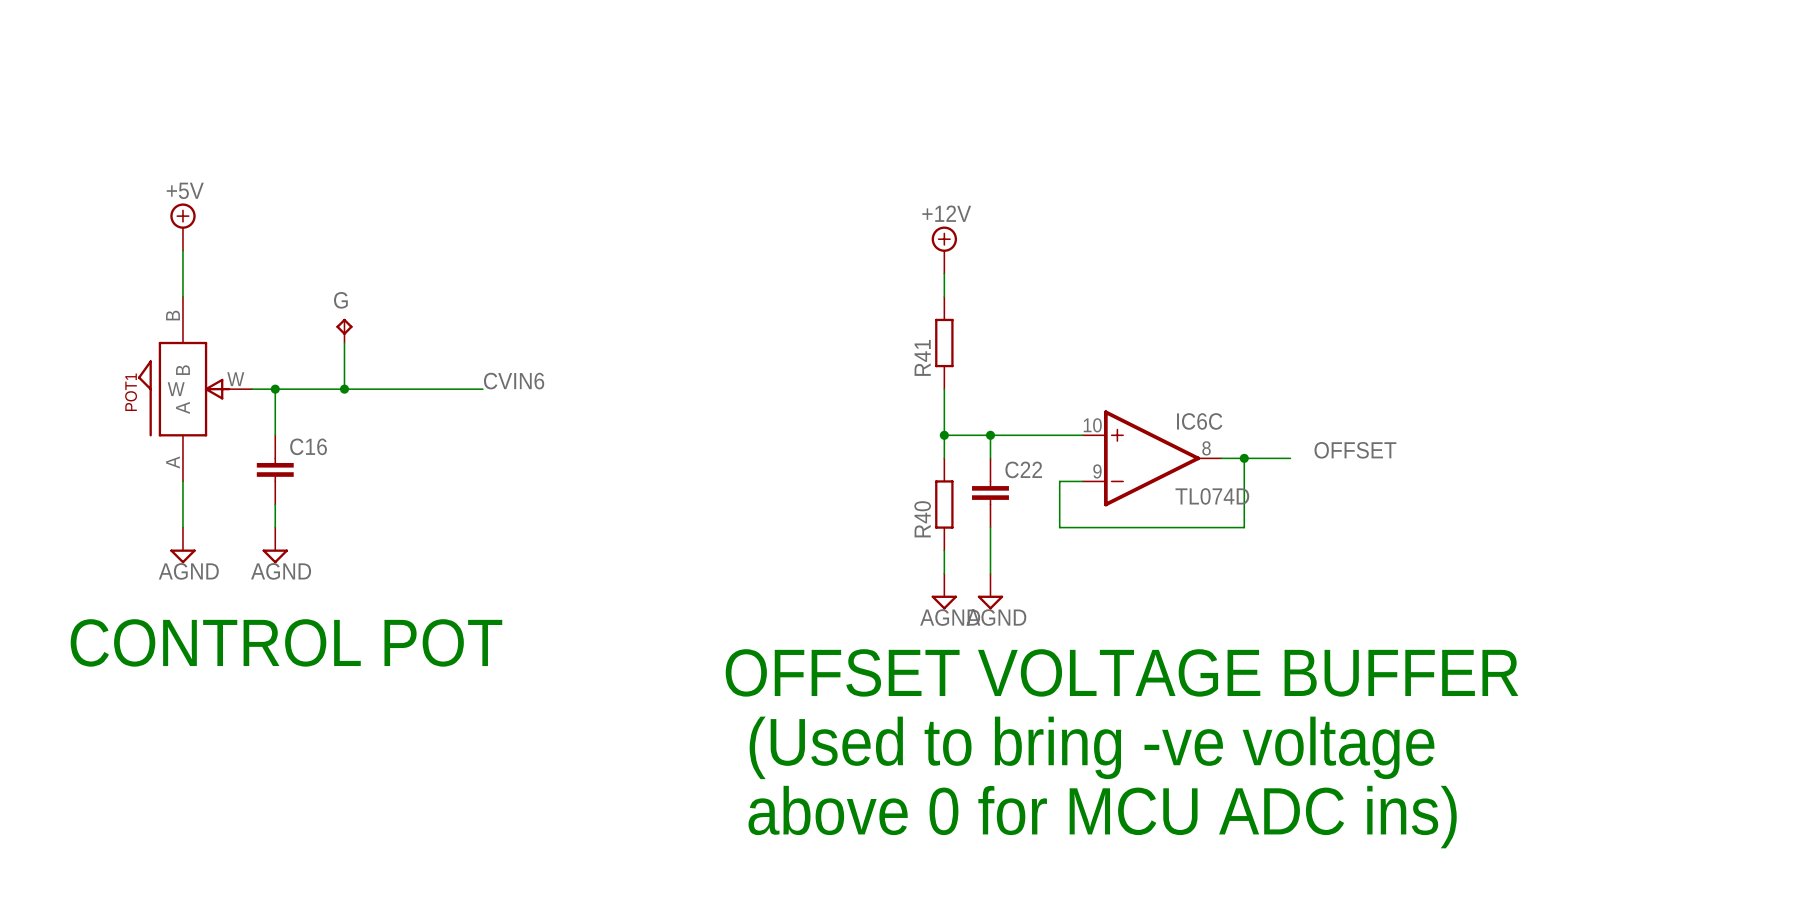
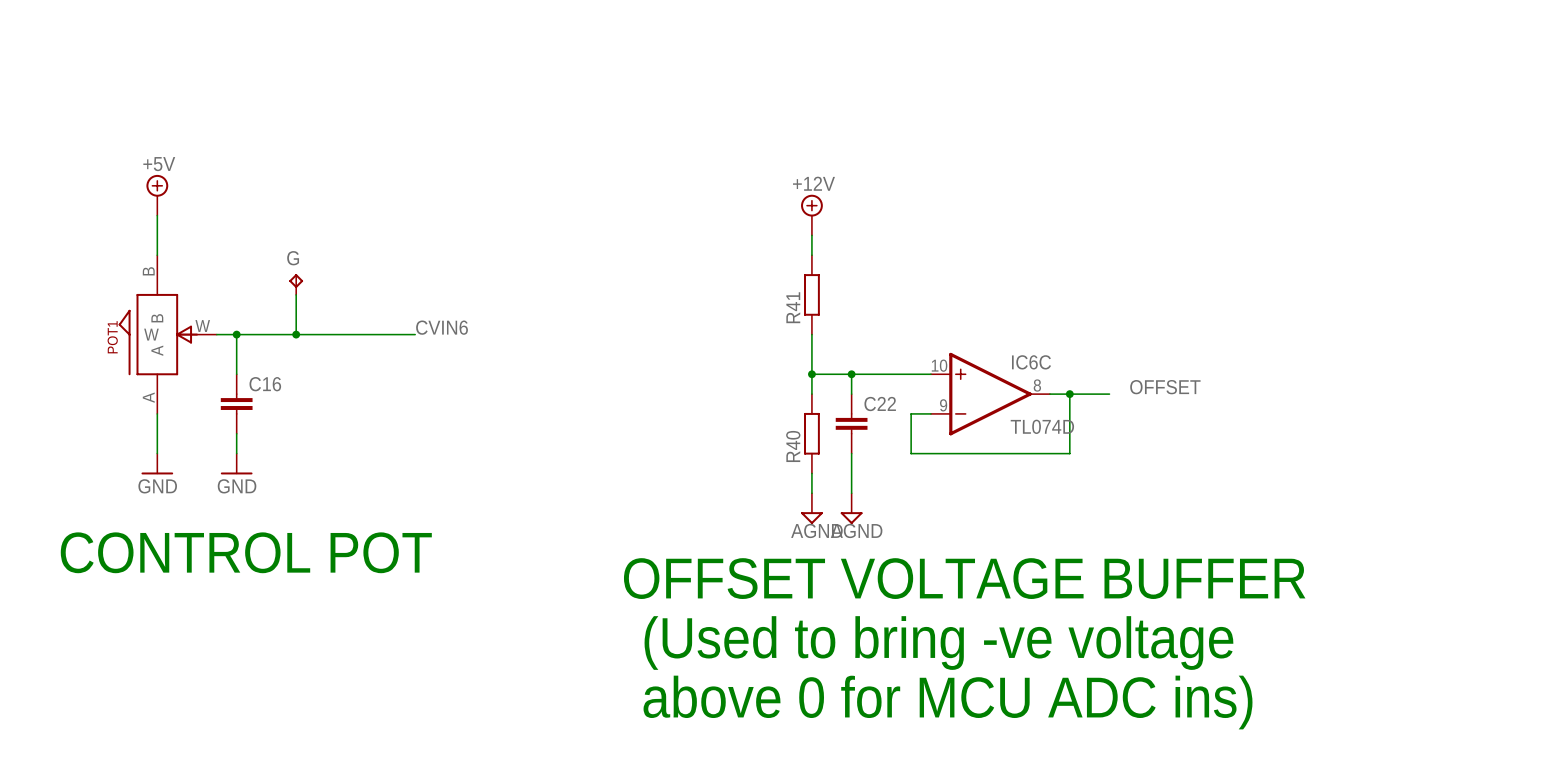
power symbol: AGND (182, 545) -> GND (157, 464)
power symbol: AGND (275, 545) -> GND (236, 464)

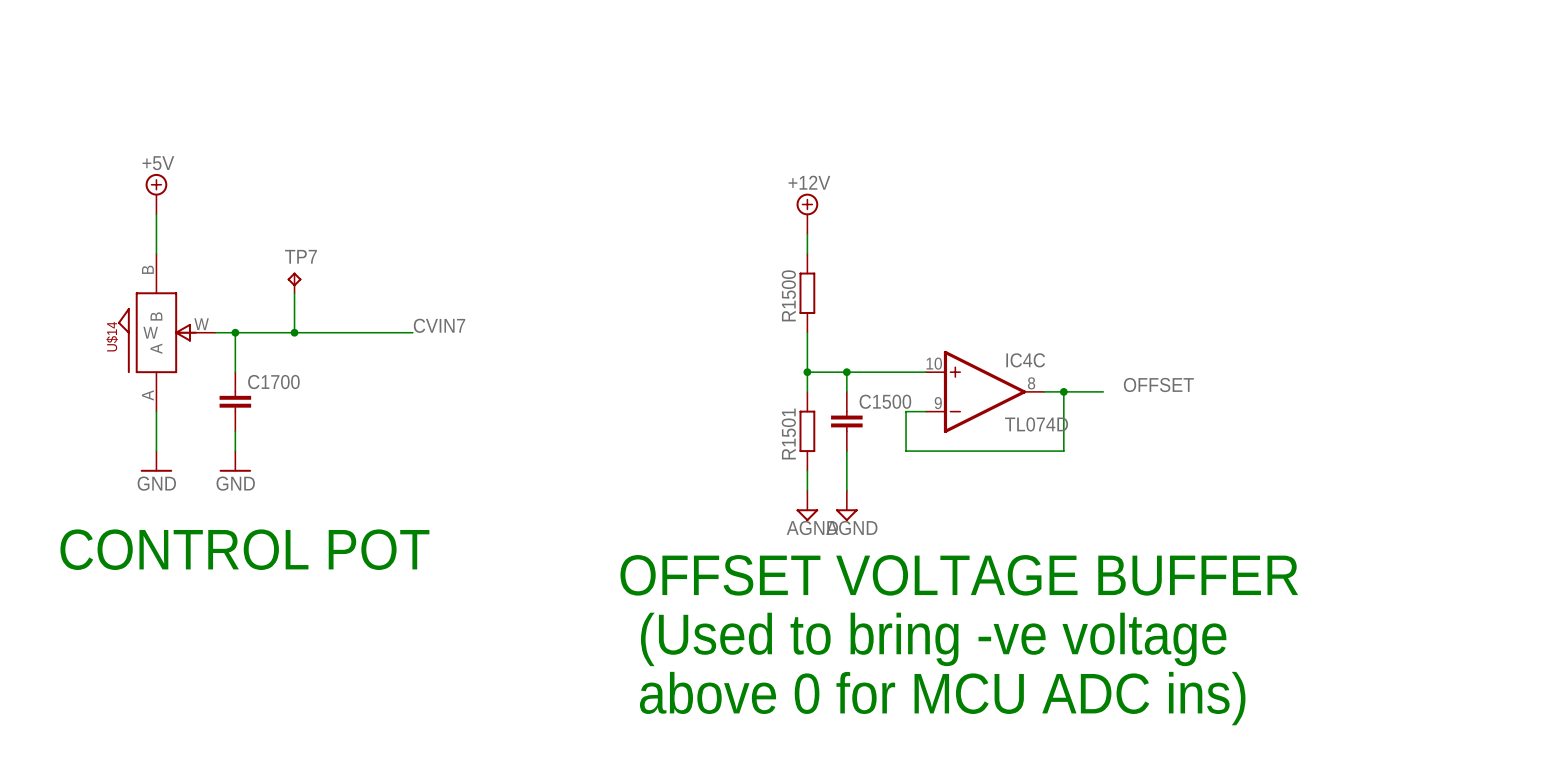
G name: G (293, 258) -> TP7 (300, 256)
R41 name: R41 (793, 307) -> R1500 (788, 295)
label: CVIN6 (442, 327) -> CVIN7 (439, 325)
POT1 name: POT1 (112, 337) -> U$14 (112, 336)
IC6C name: IC6C (1031, 362) -> IC4C (1025, 360)
C16 name: C16 (265, 384) -> C1700 (273, 382)
C22 name: C22 (880, 404) -> C1500 (885, 401)
R40 name: R40 (793, 446) -> R1501 (788, 434)

